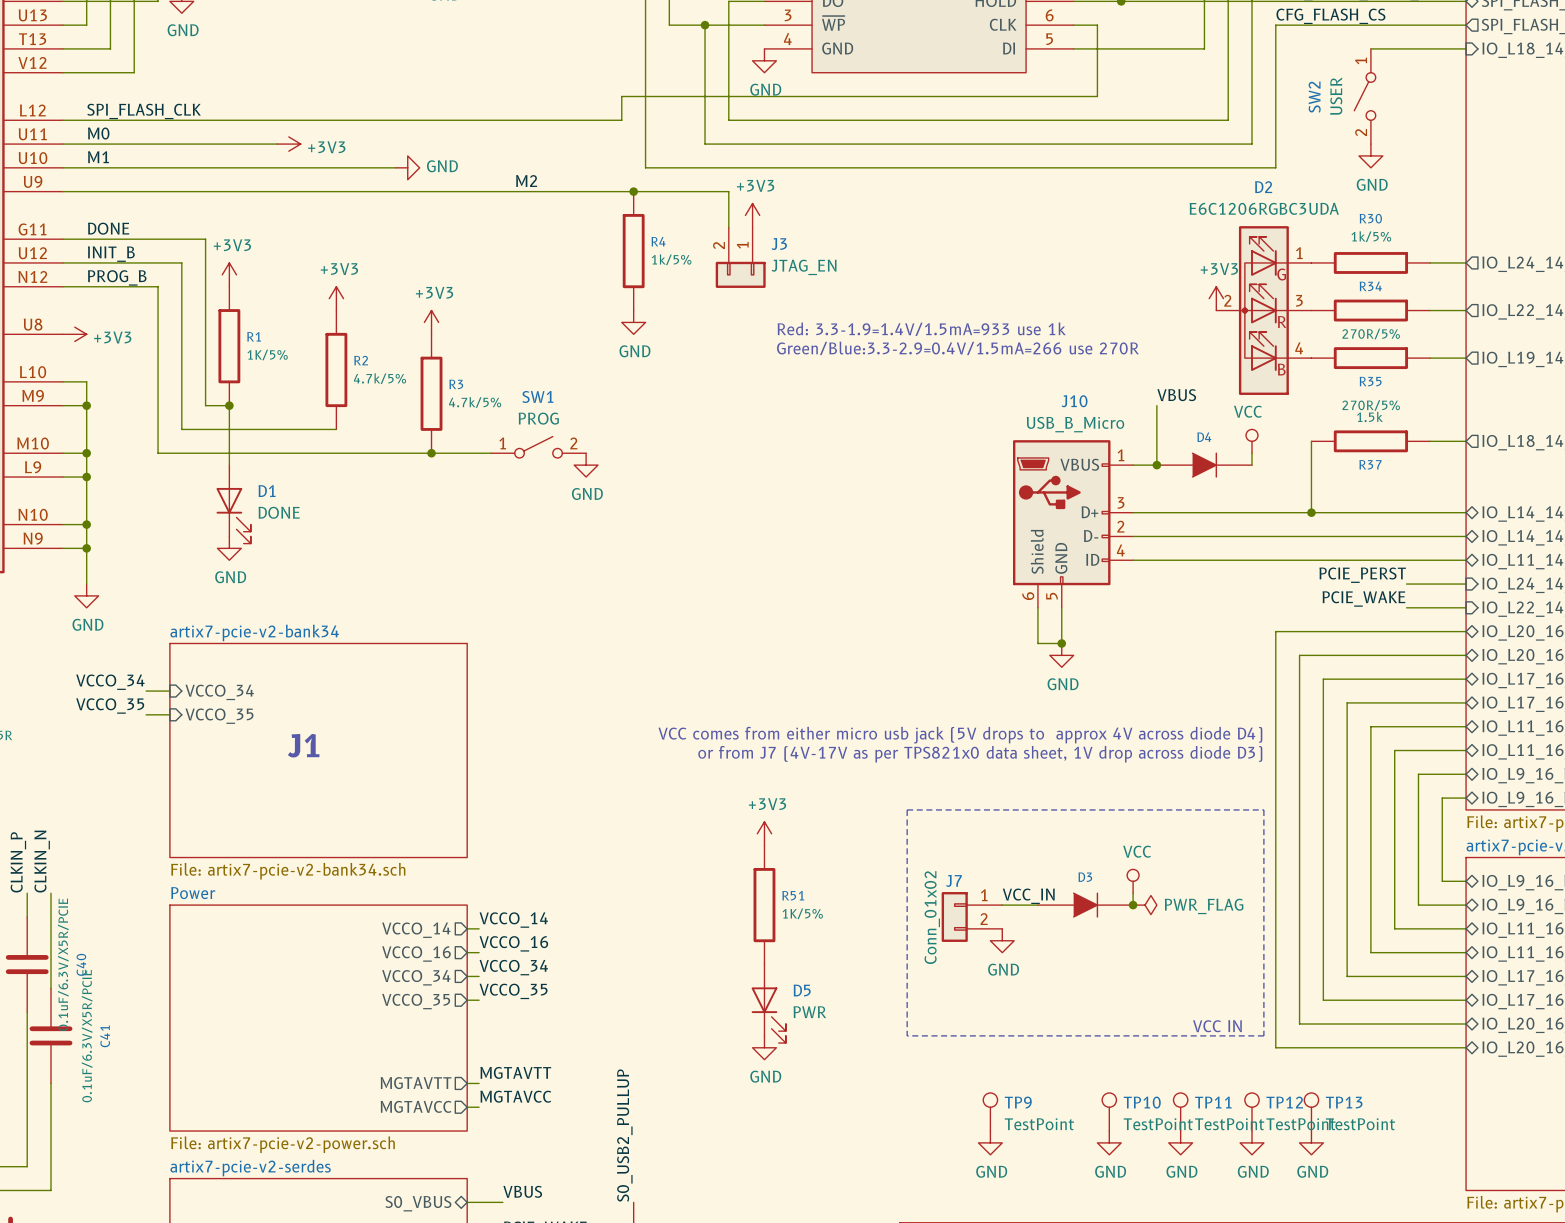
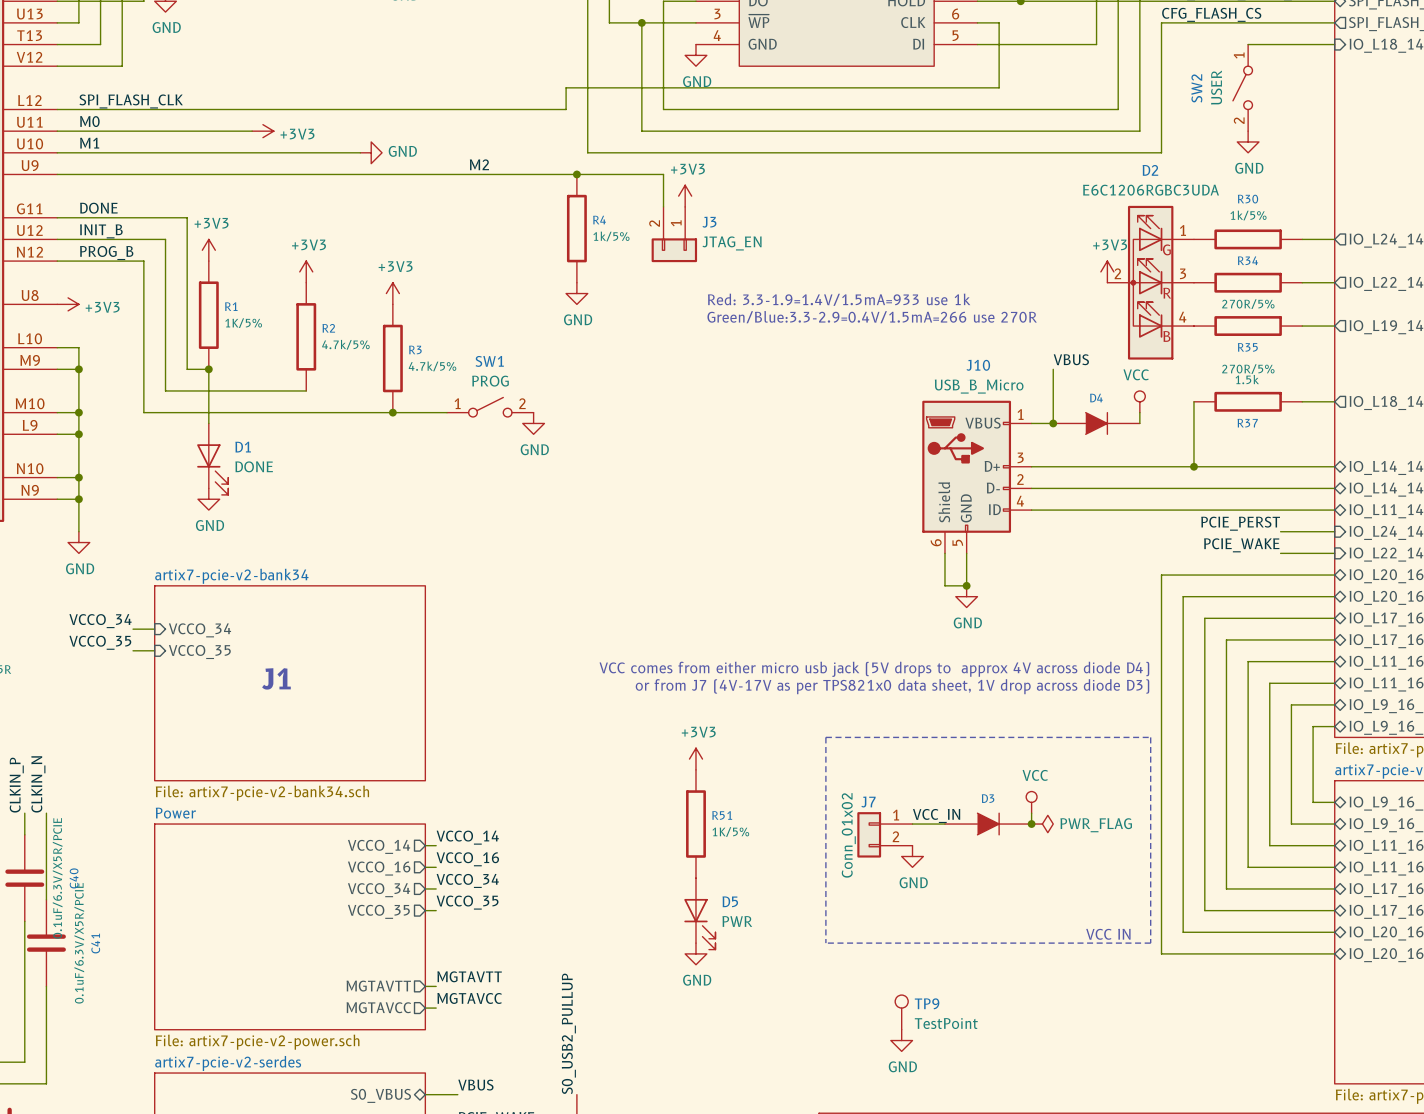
TP10: TestPoint (1109, 1112) -> none
TP11: TestPoint (1180, 1112) -> none
TP12: TestPoint (1252, 1112) -> none
TP13: TestPoint (1311, 1112) -> none
power symbol: GND (1109, 1142) -> none
power symbol: GND (1180, 1142) -> none
power symbol: GND (1252, 1142) -> none
power symbol: GND (1311, 1142) -> none

